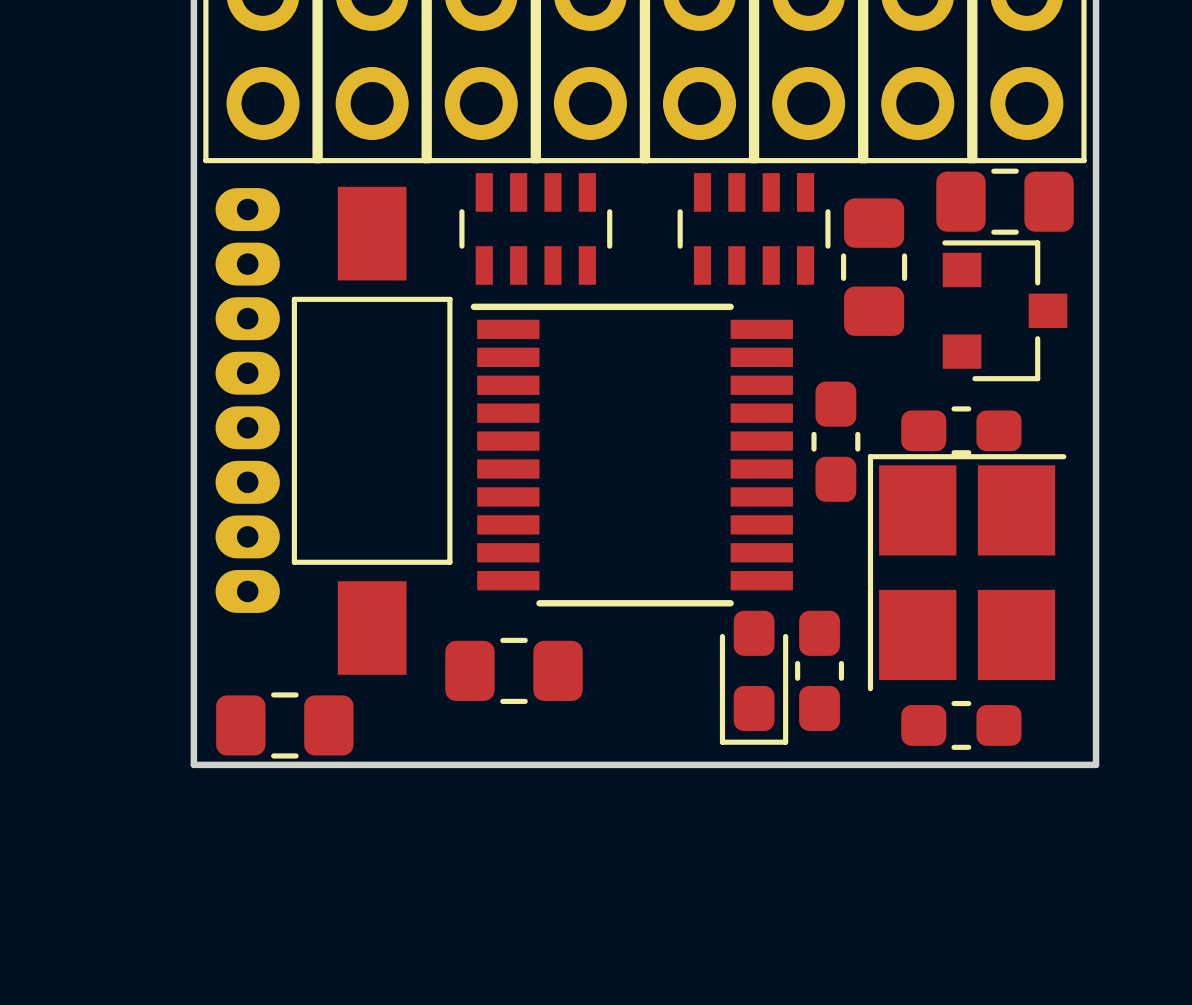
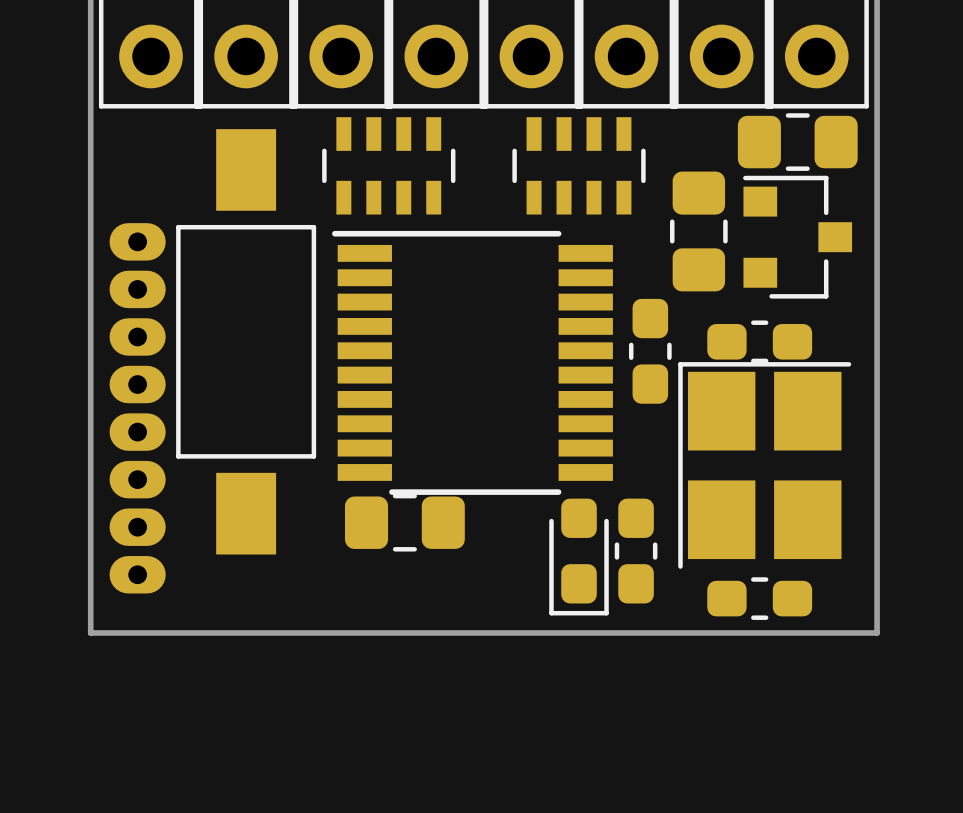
part position: (874, 267) -> (698, 231)
part position: (247, 400) -> (137, 408)
part position: (514, 670) -> (404, 522)
part: (284, 725) -> none

